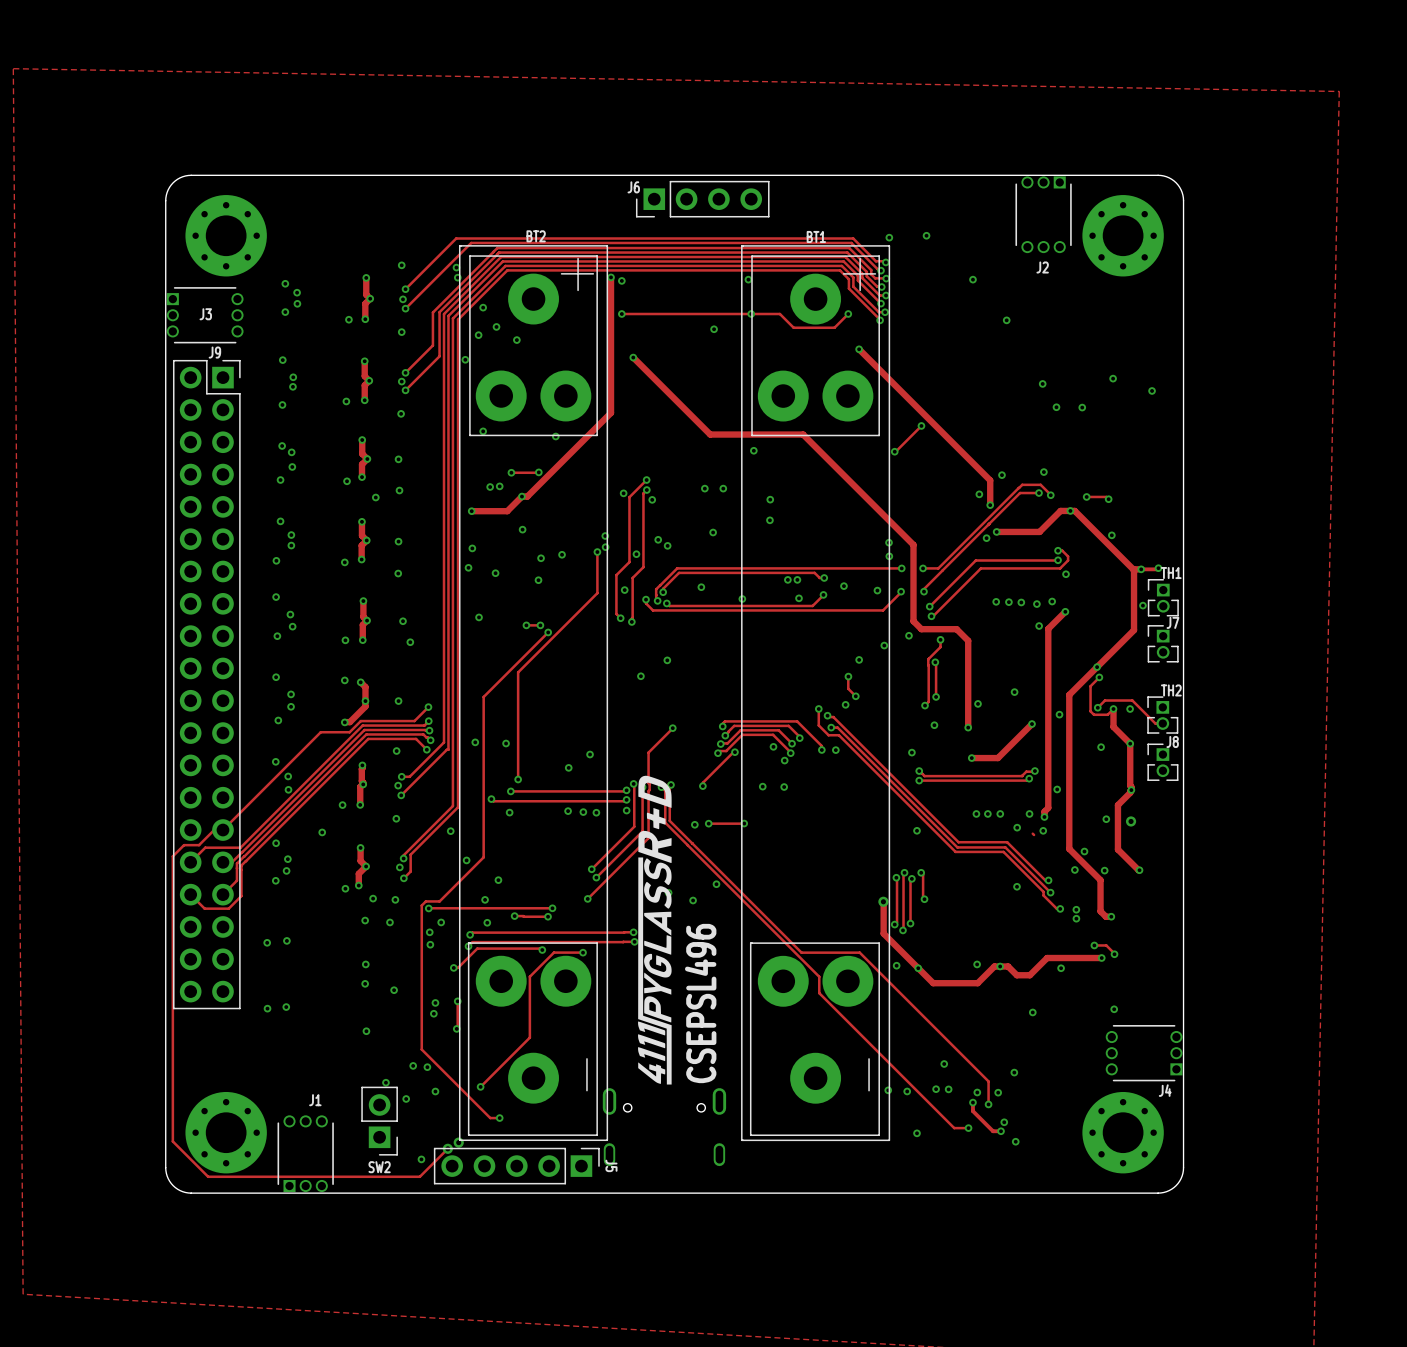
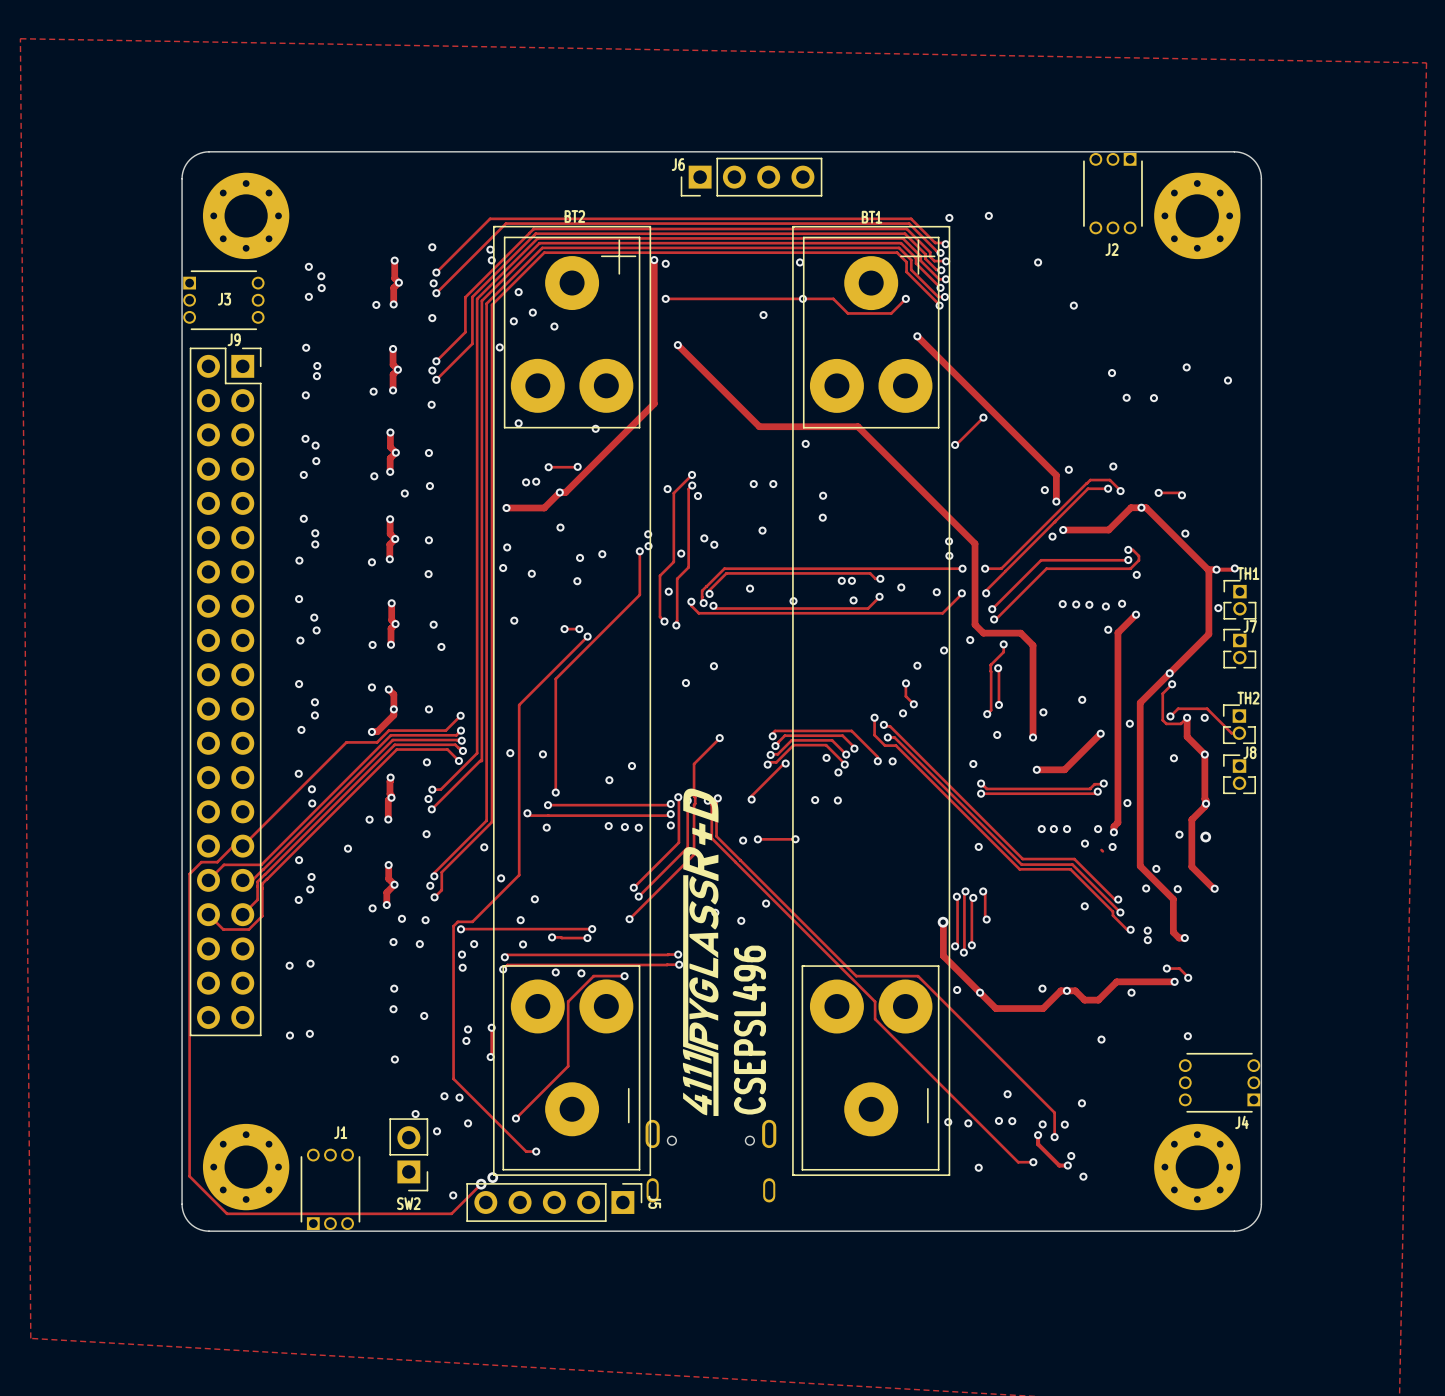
track: (542, 950) (477, 948) (457, 967) (453, 967) -> none
via position: (453, 967) -> (555, 972)

